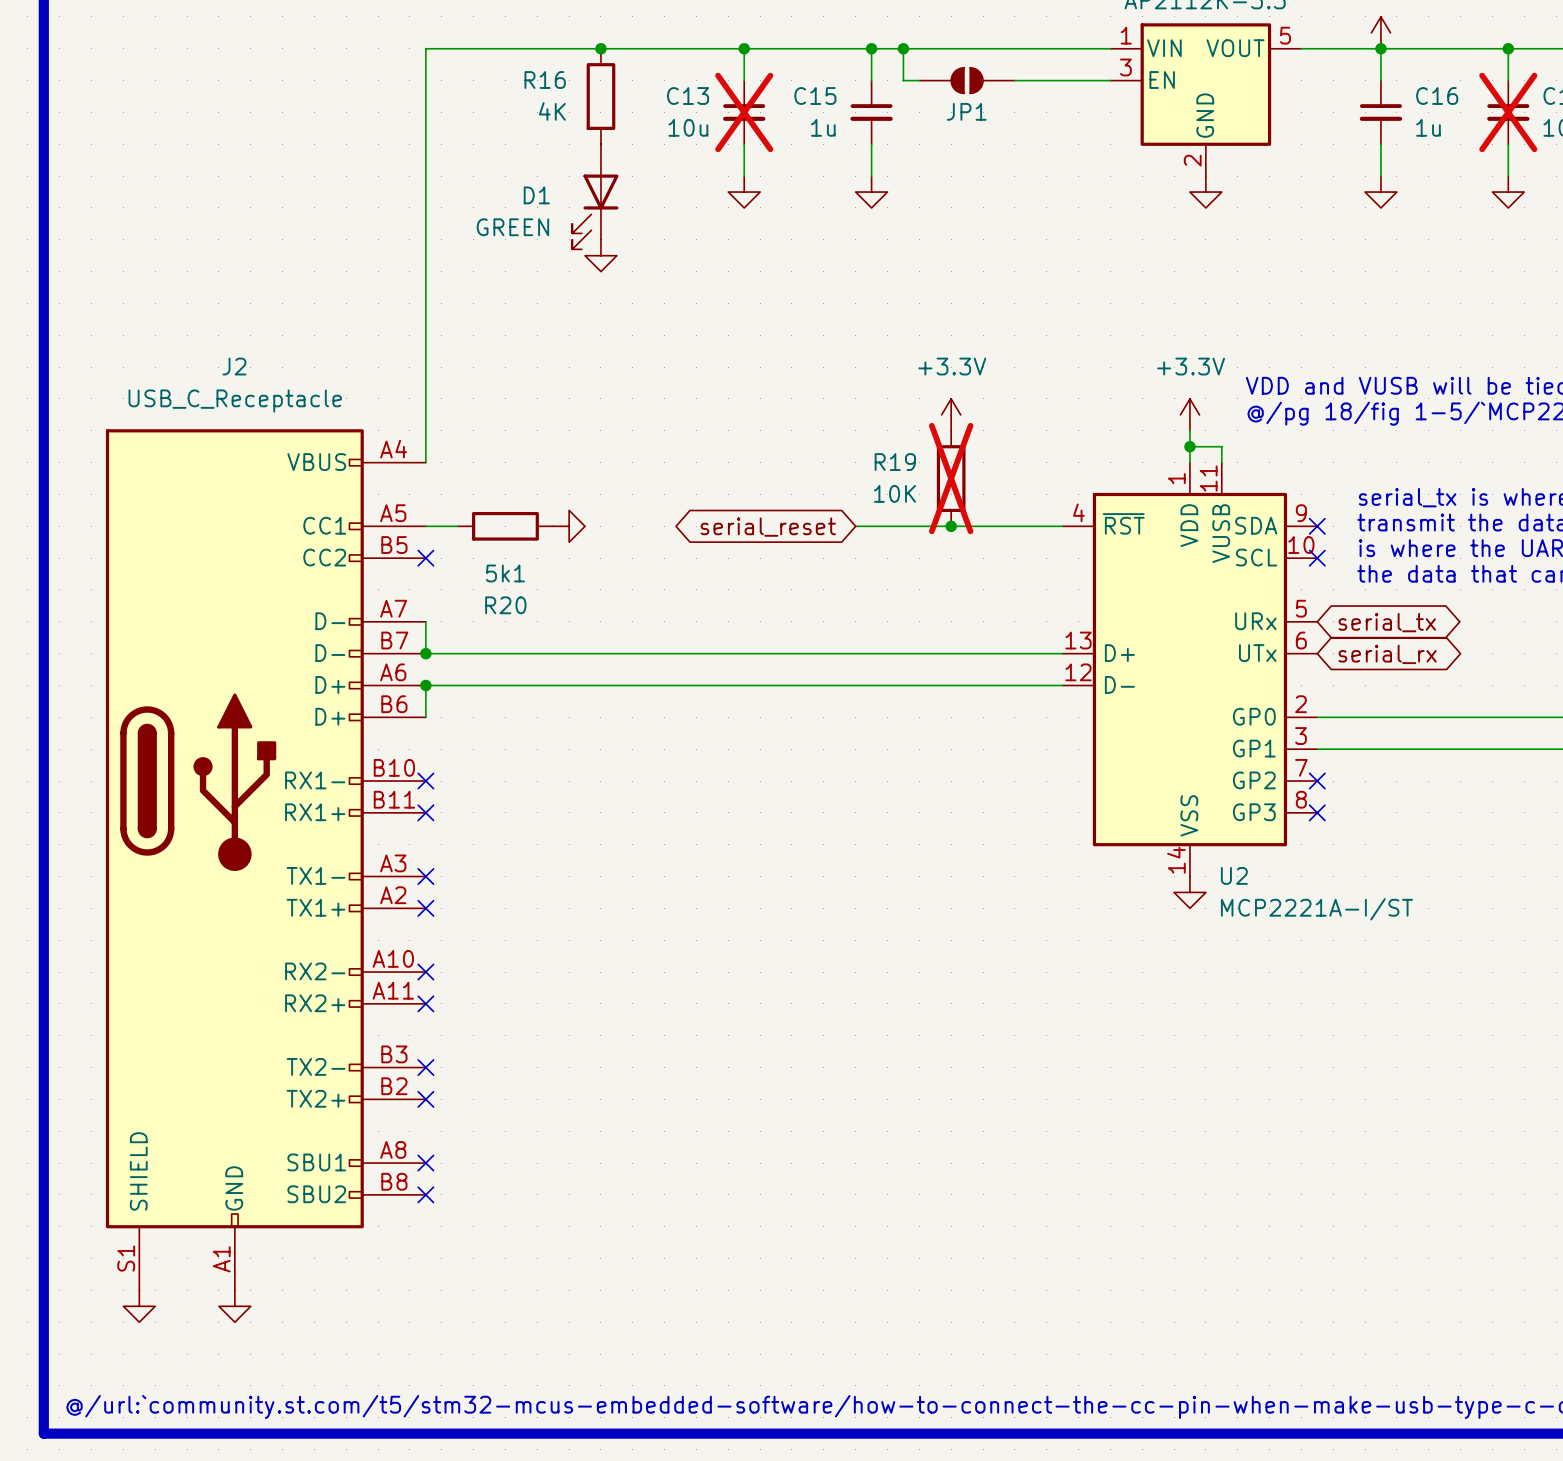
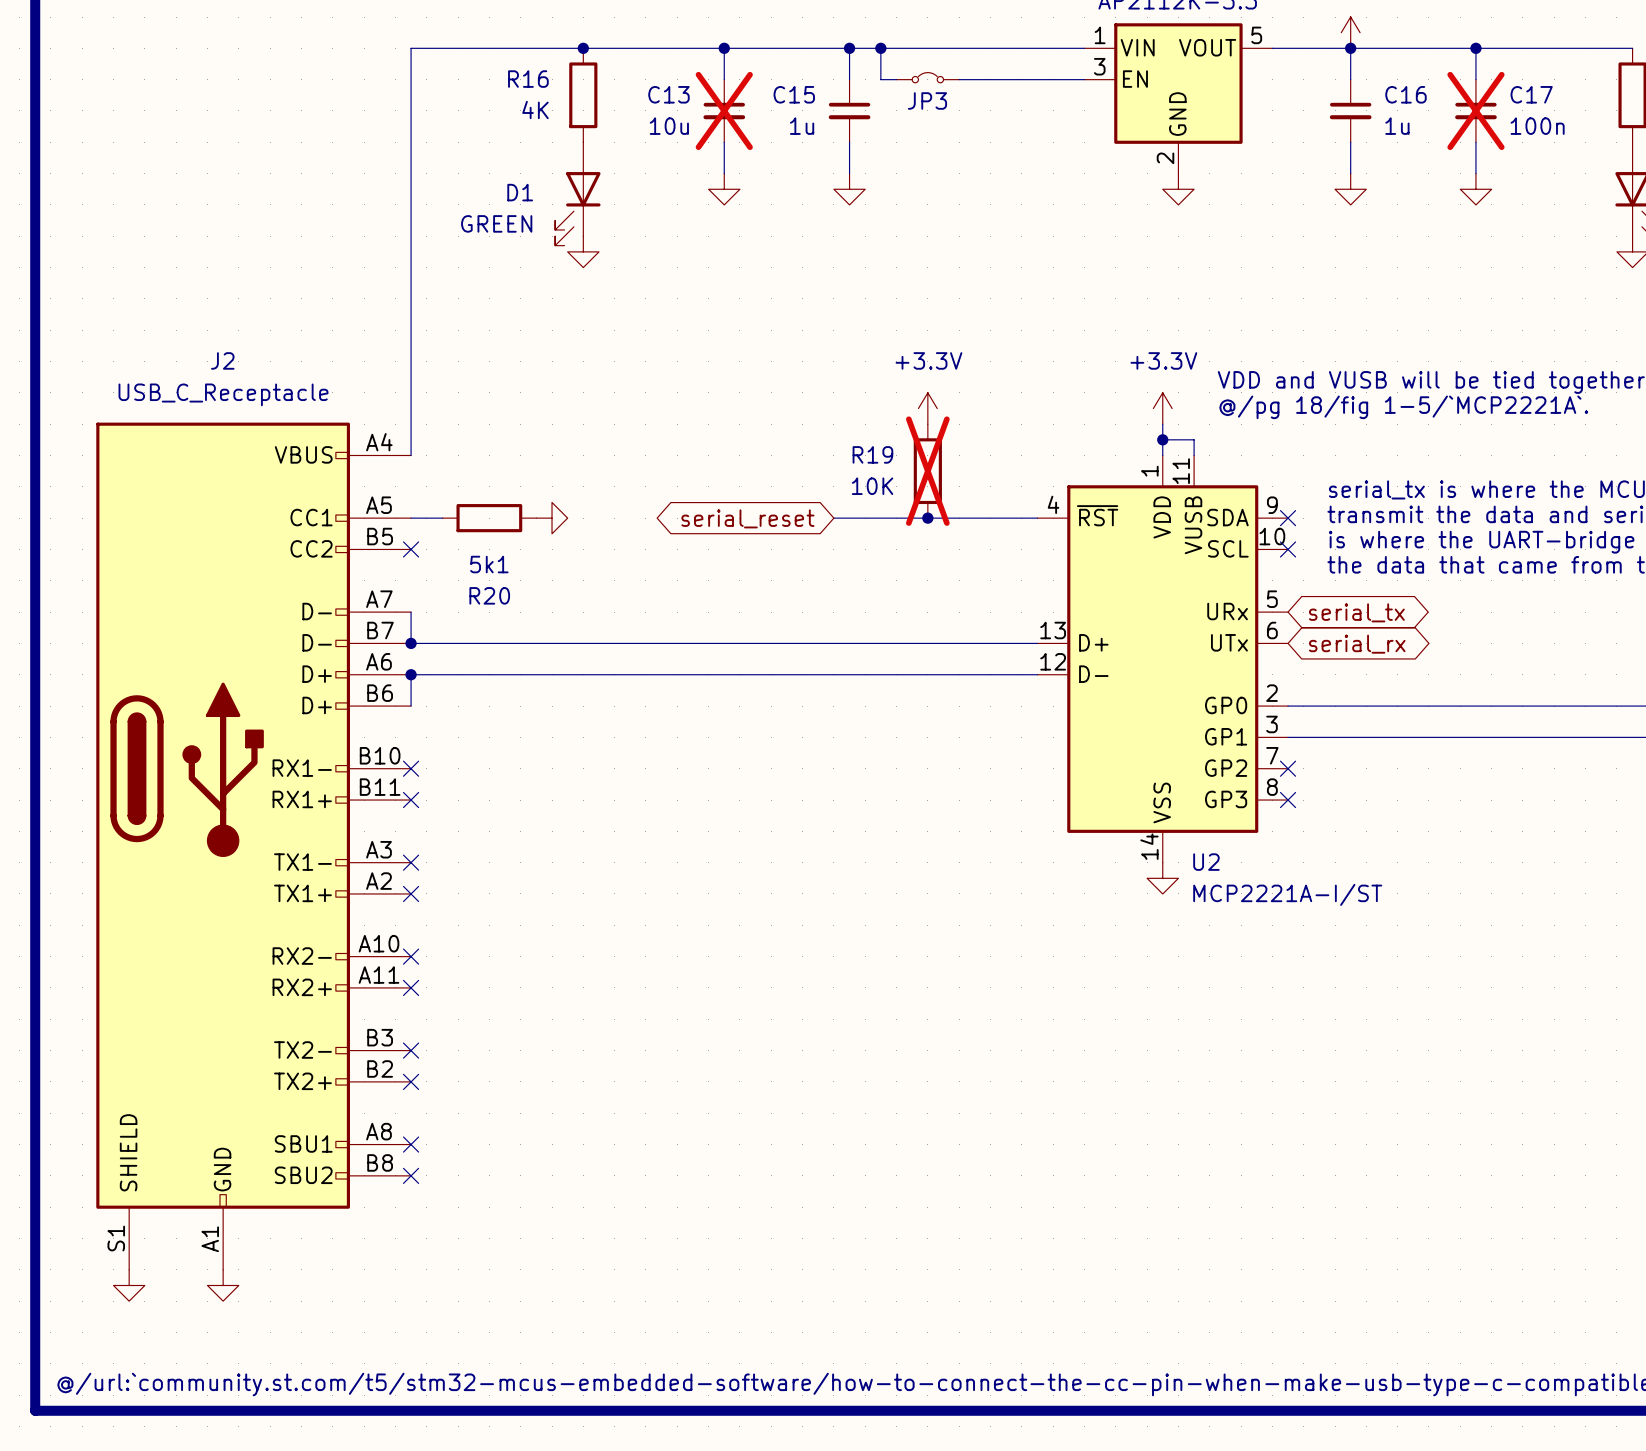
JP3: none -> (927, 77)
JP1: (967, 80) -> none

